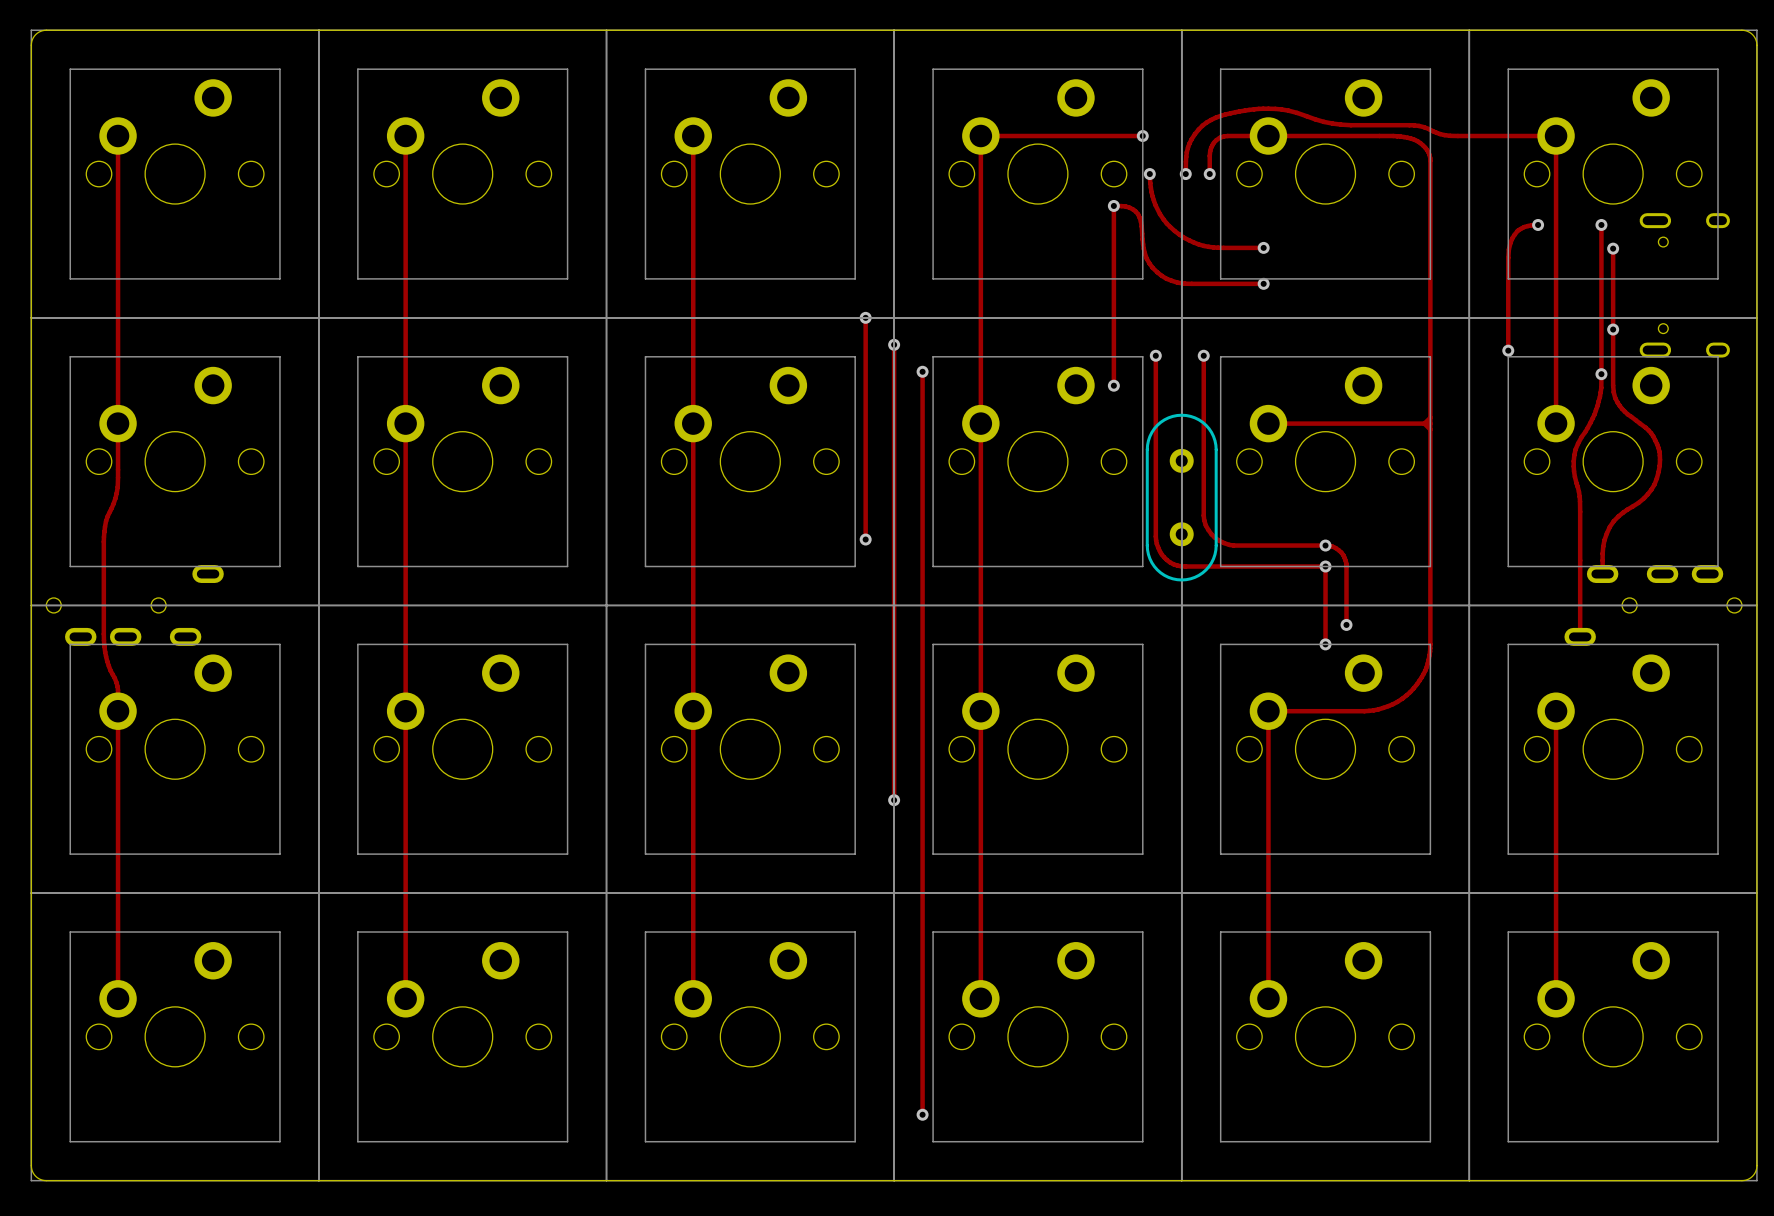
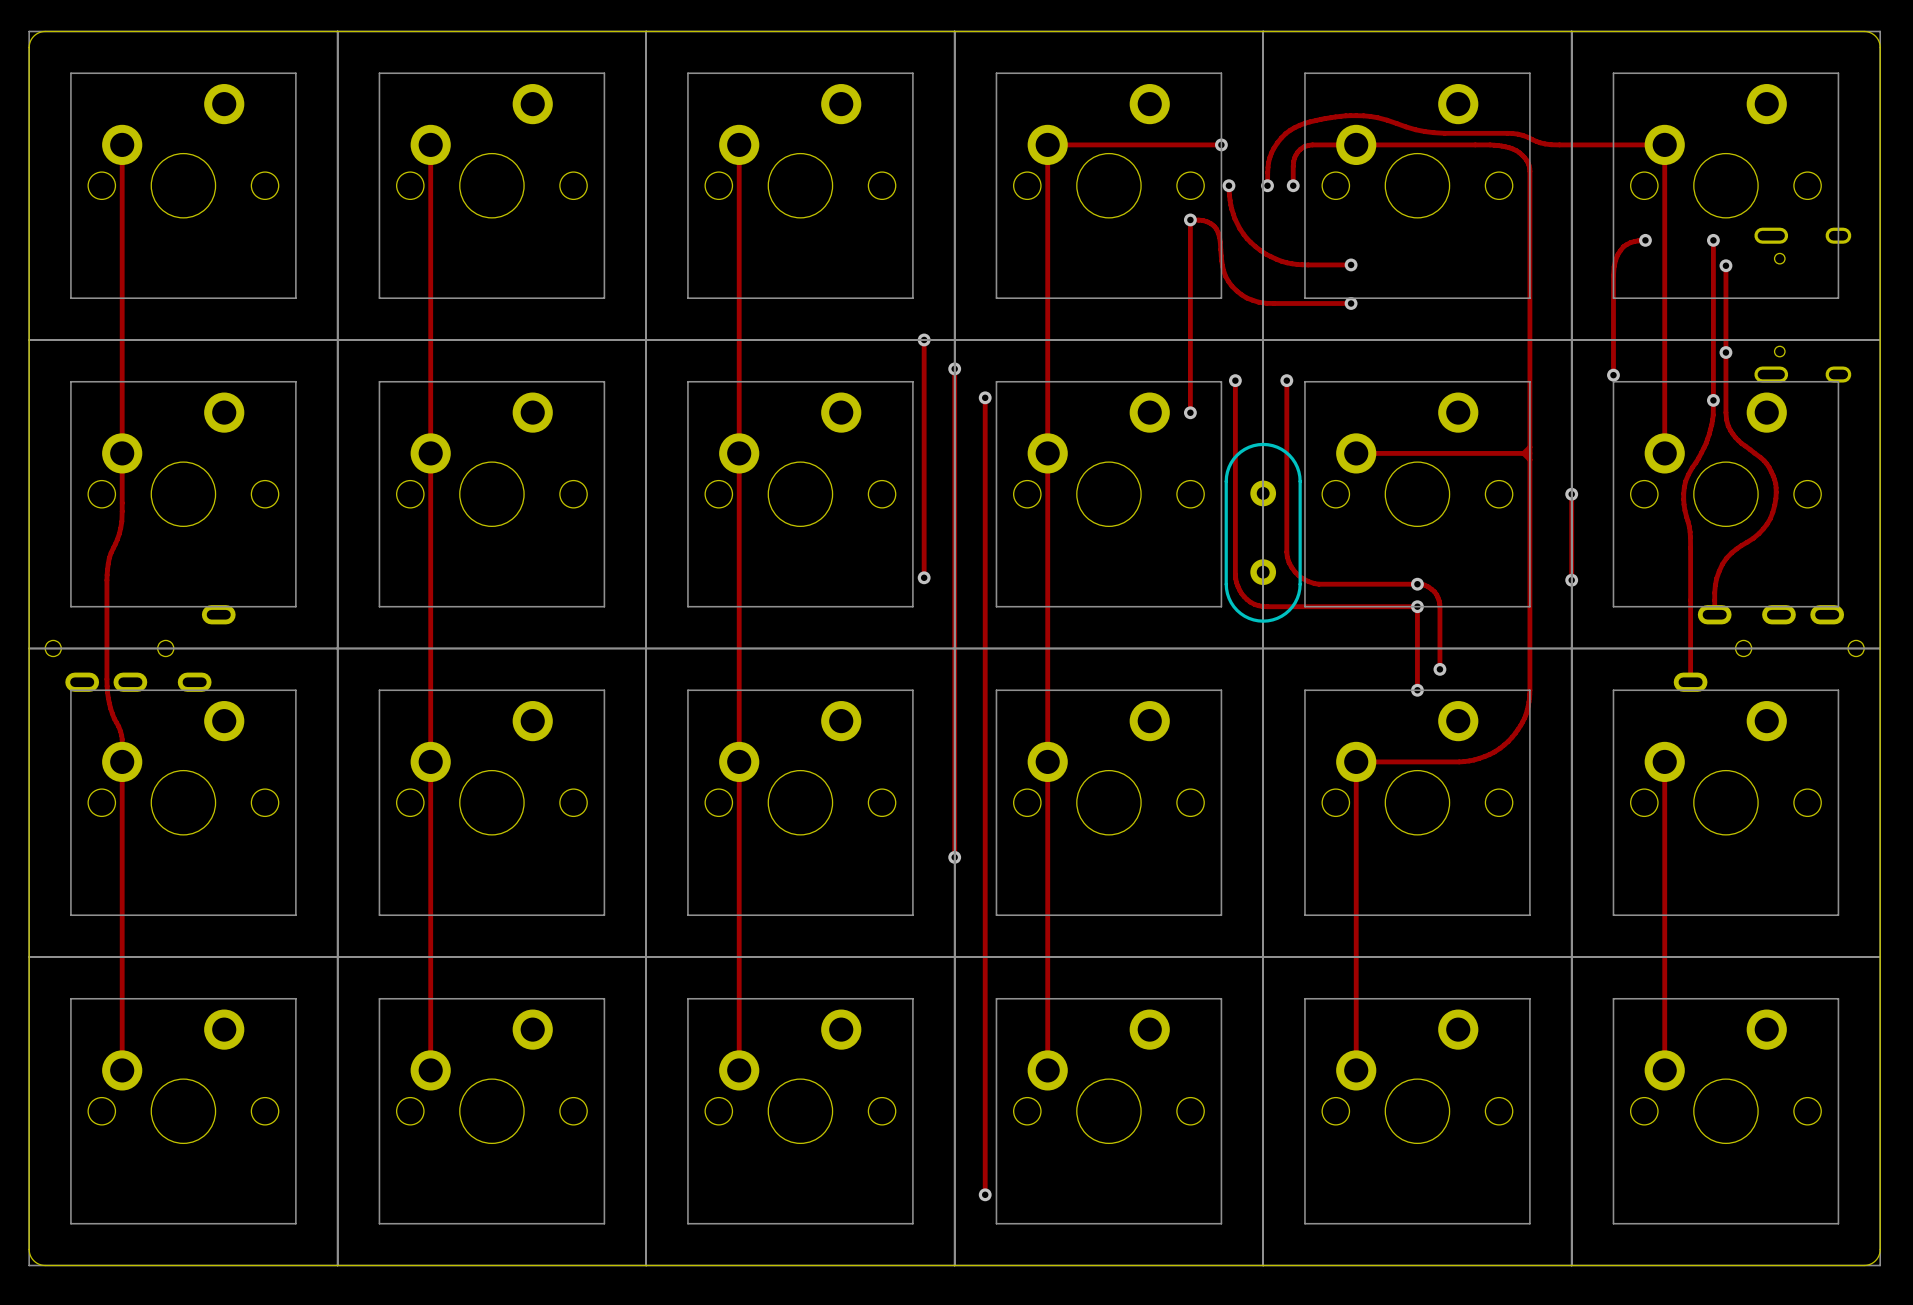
track: none -> (1571, 494) (1571, 580)
via: none -> (1571, 494)
via: none -> (1571, 580)

